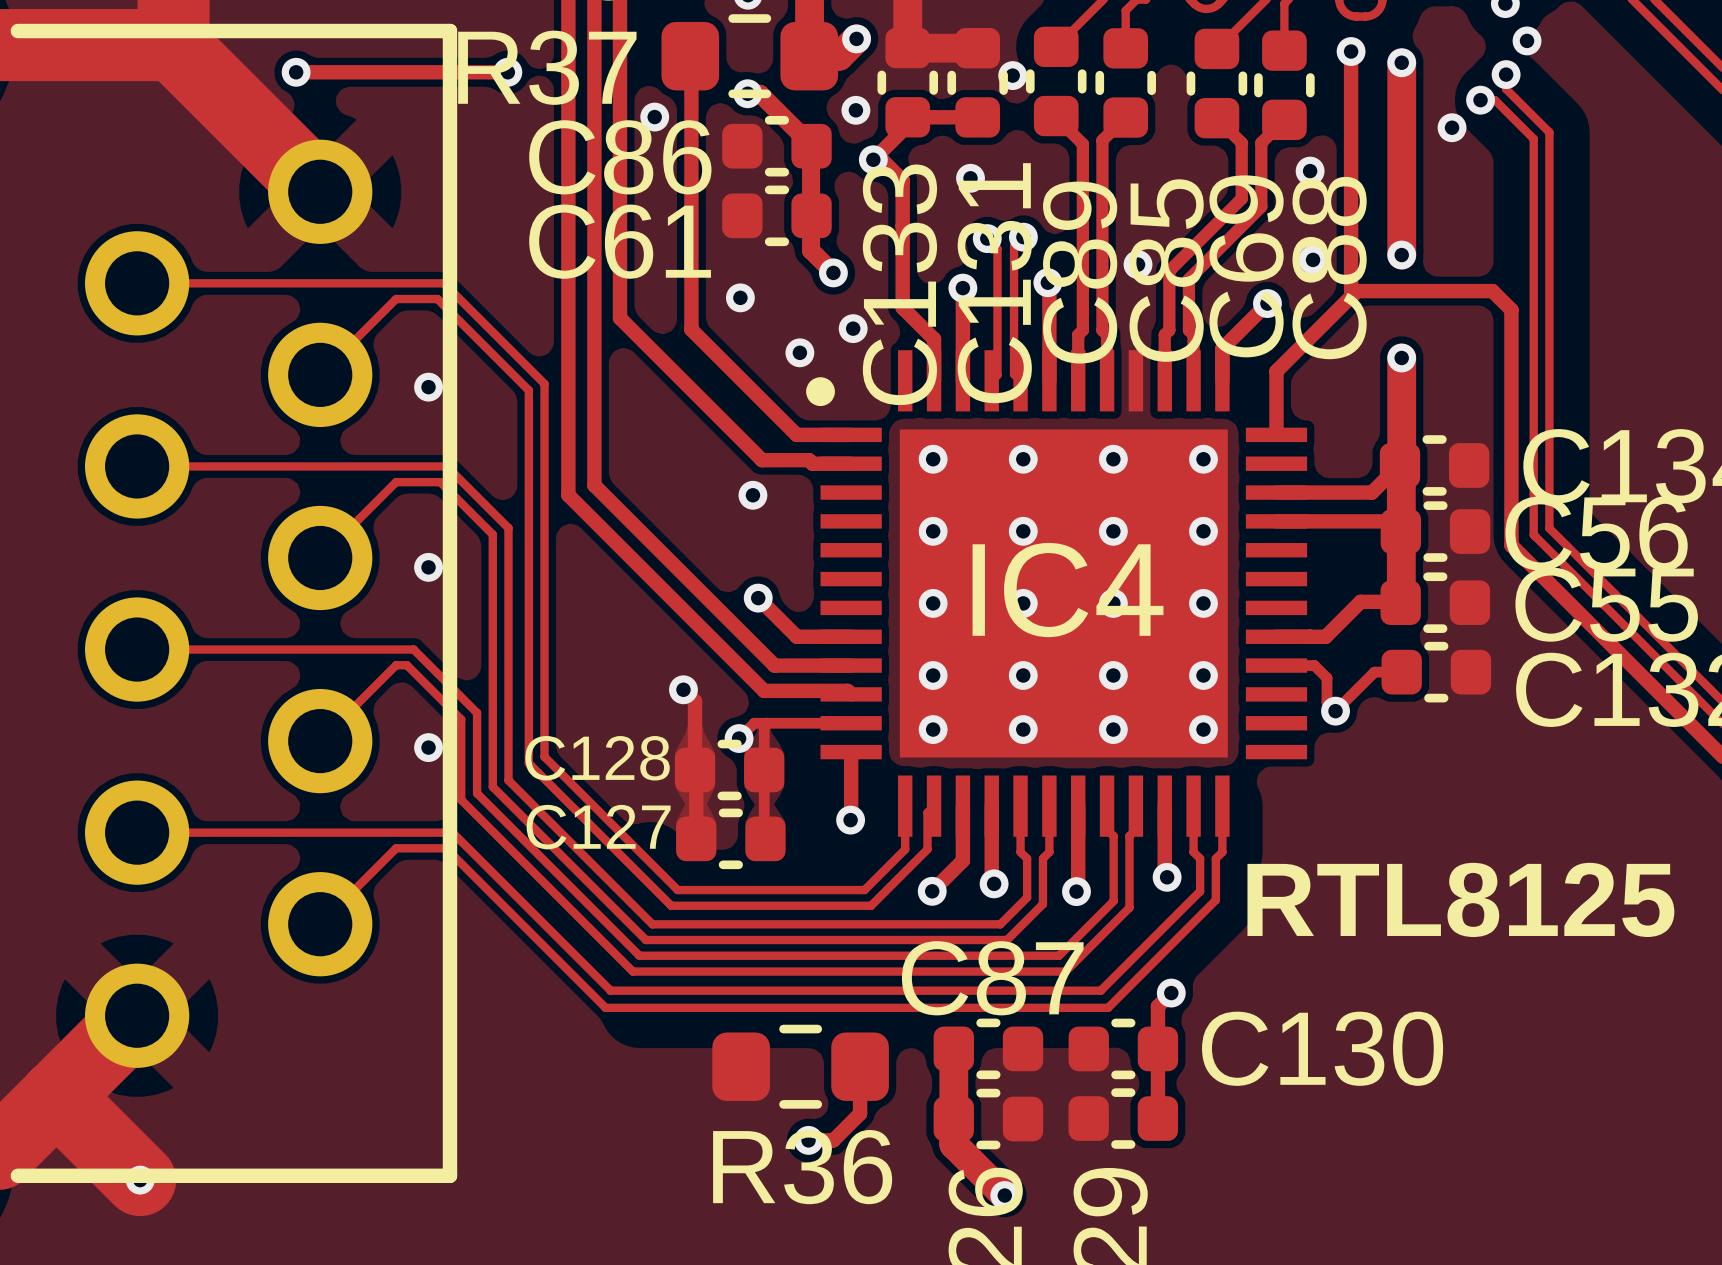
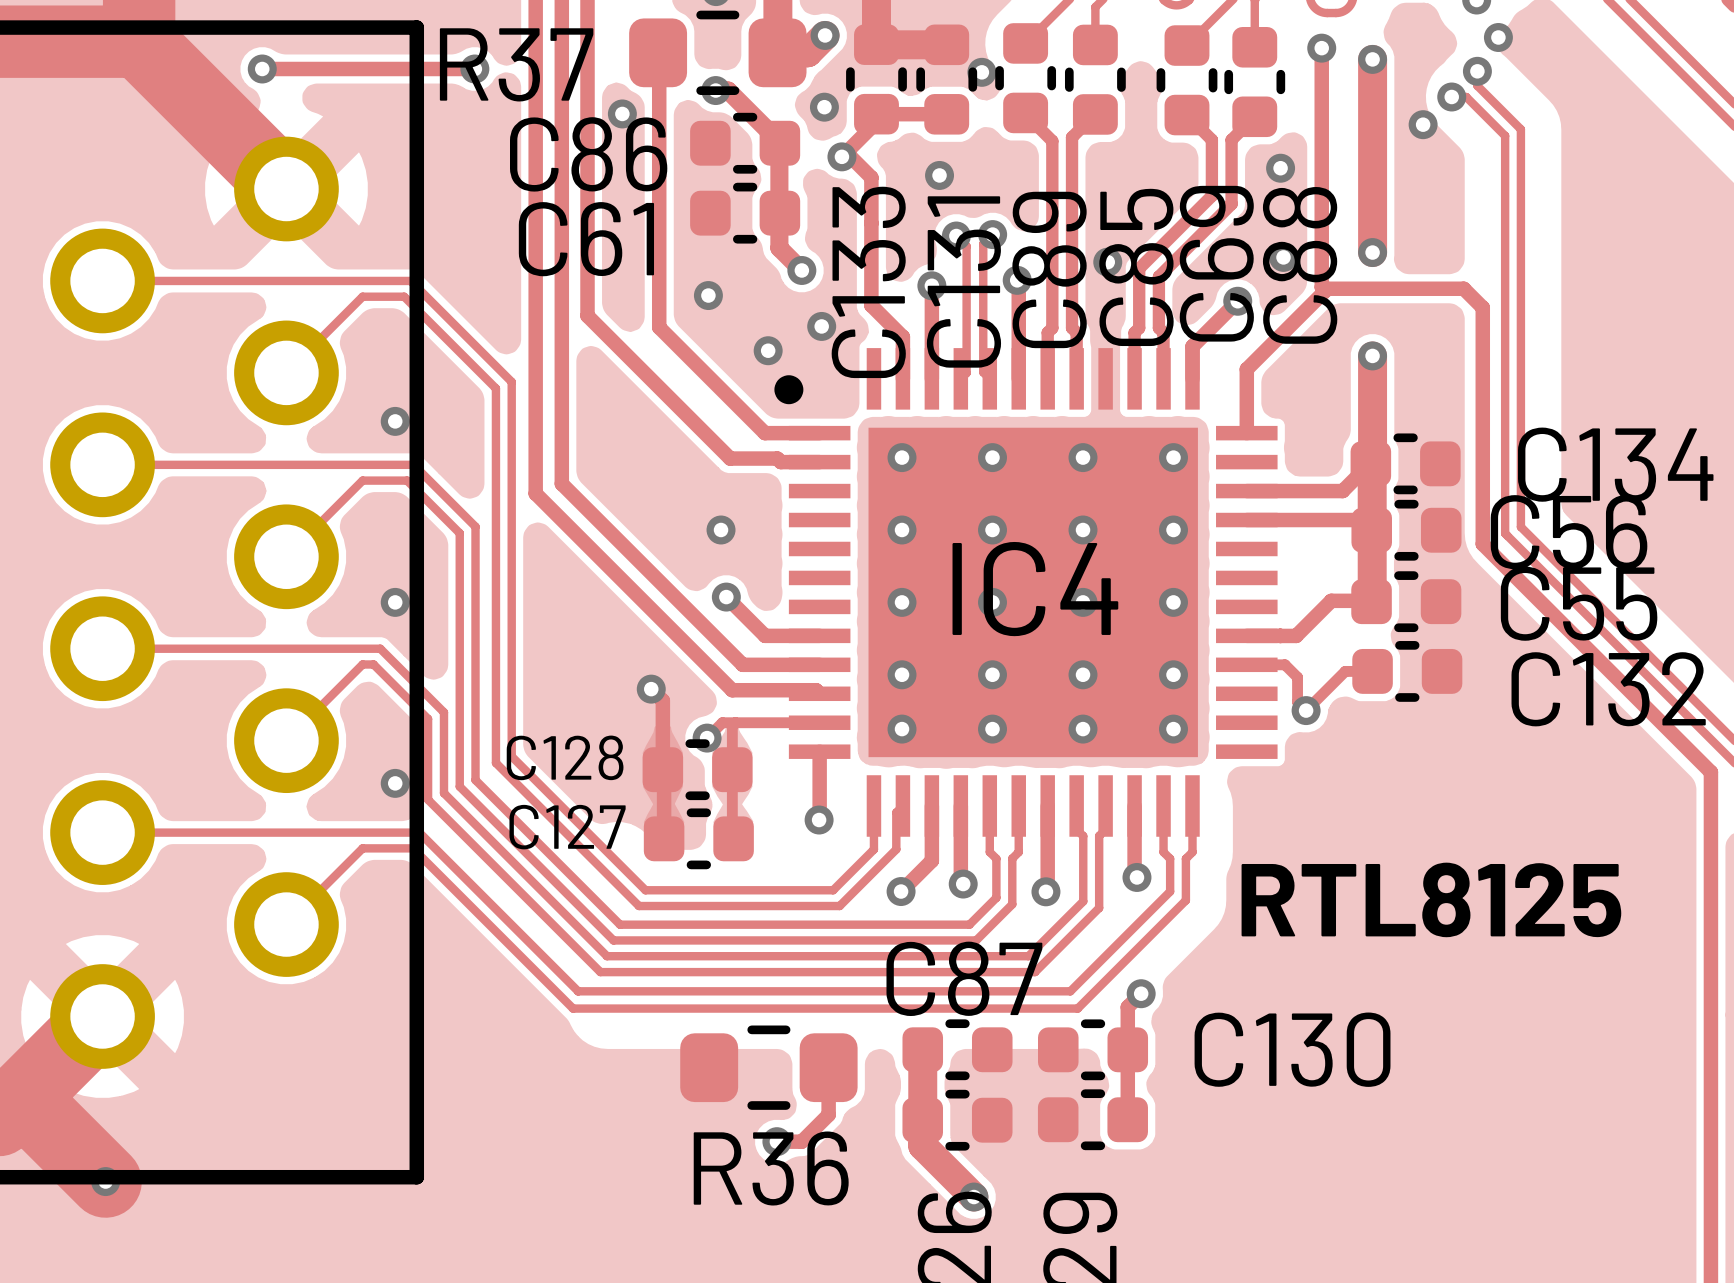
via position: (428, 387) -> (395, 421)
via position: (752, 495) -> (721, 529)
via position: (428, 567) -> (395, 602)
via position: (428, 747) -> (395, 783)

